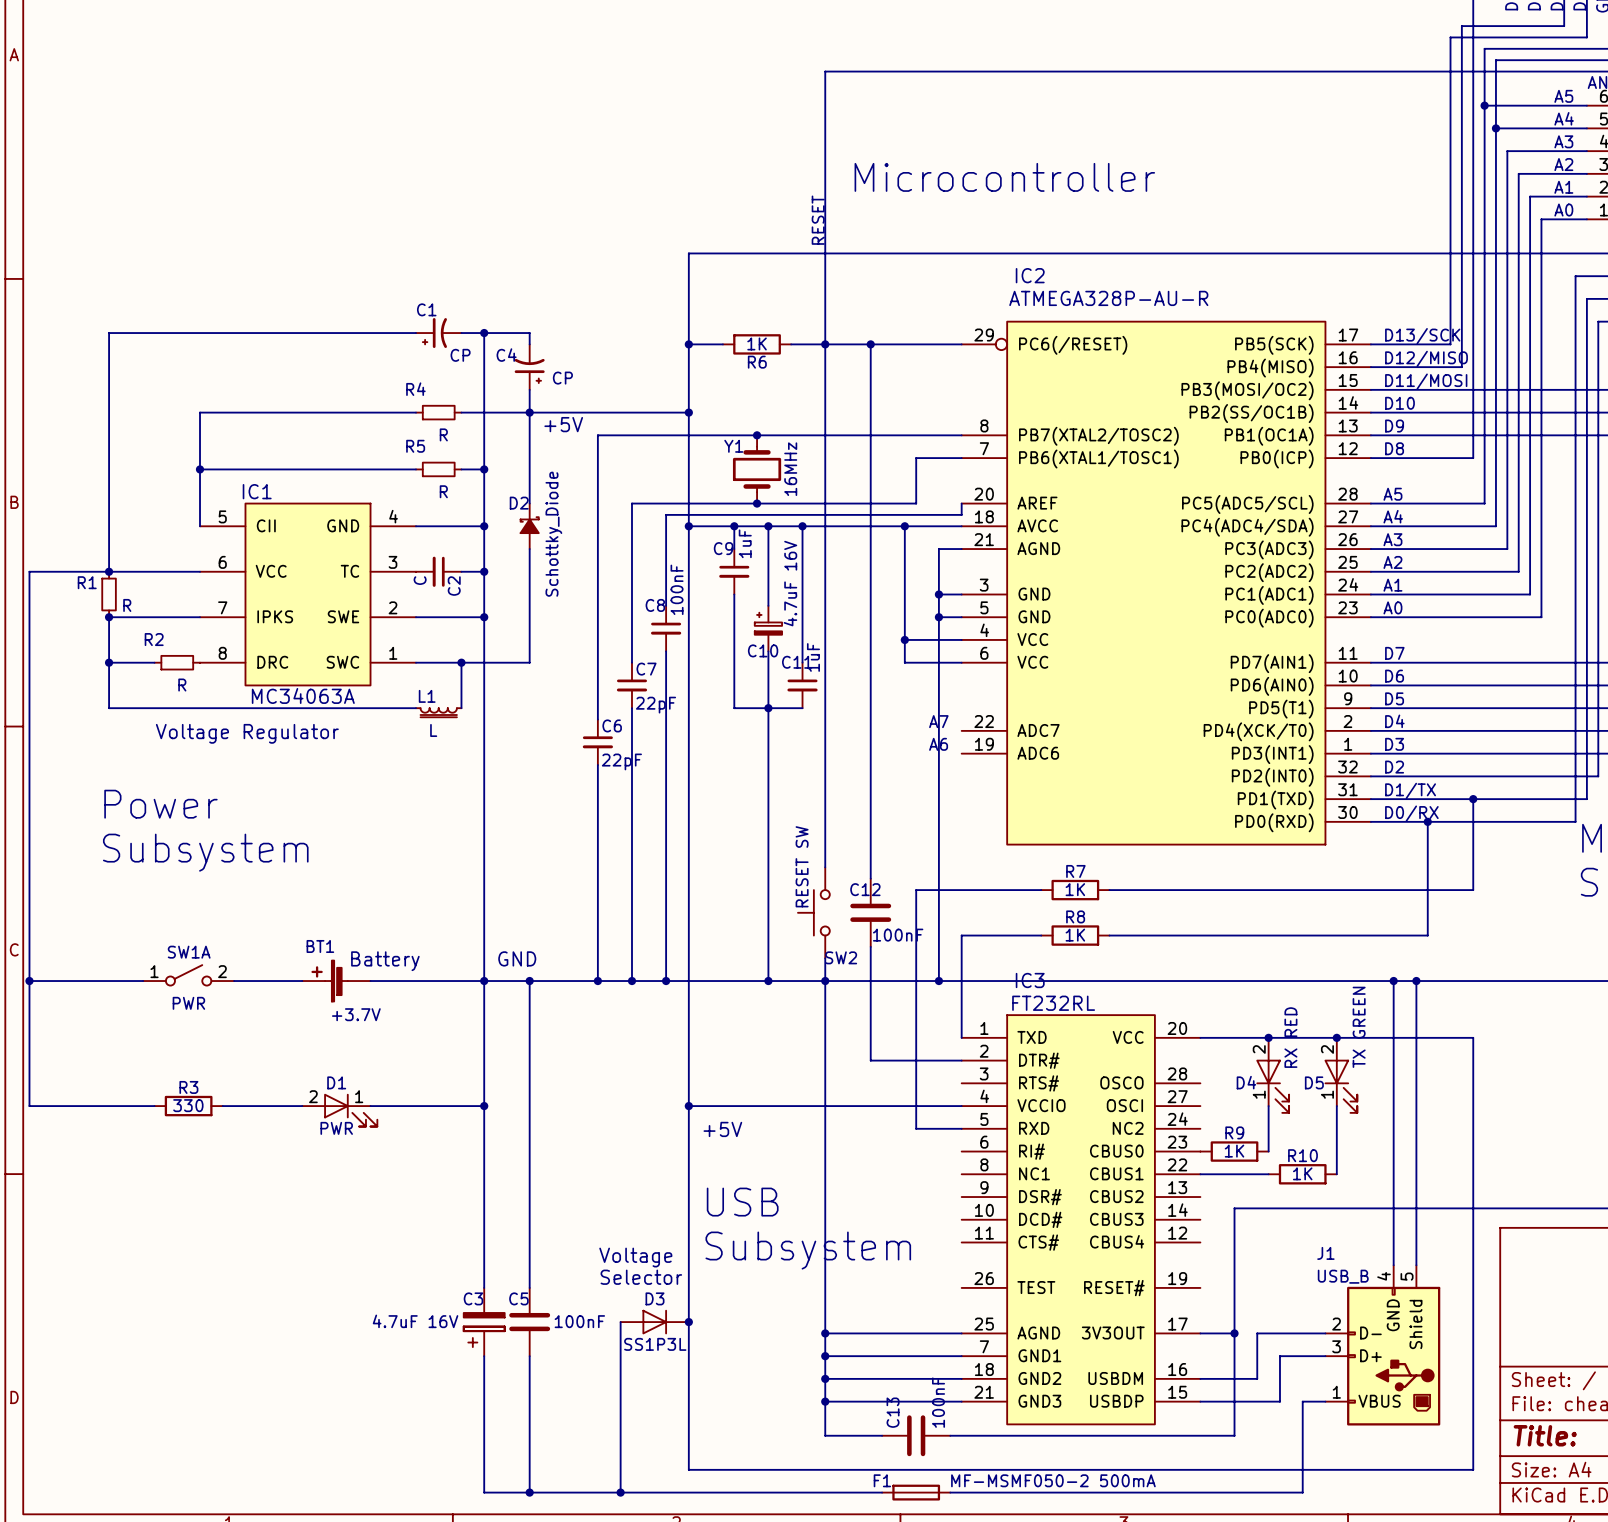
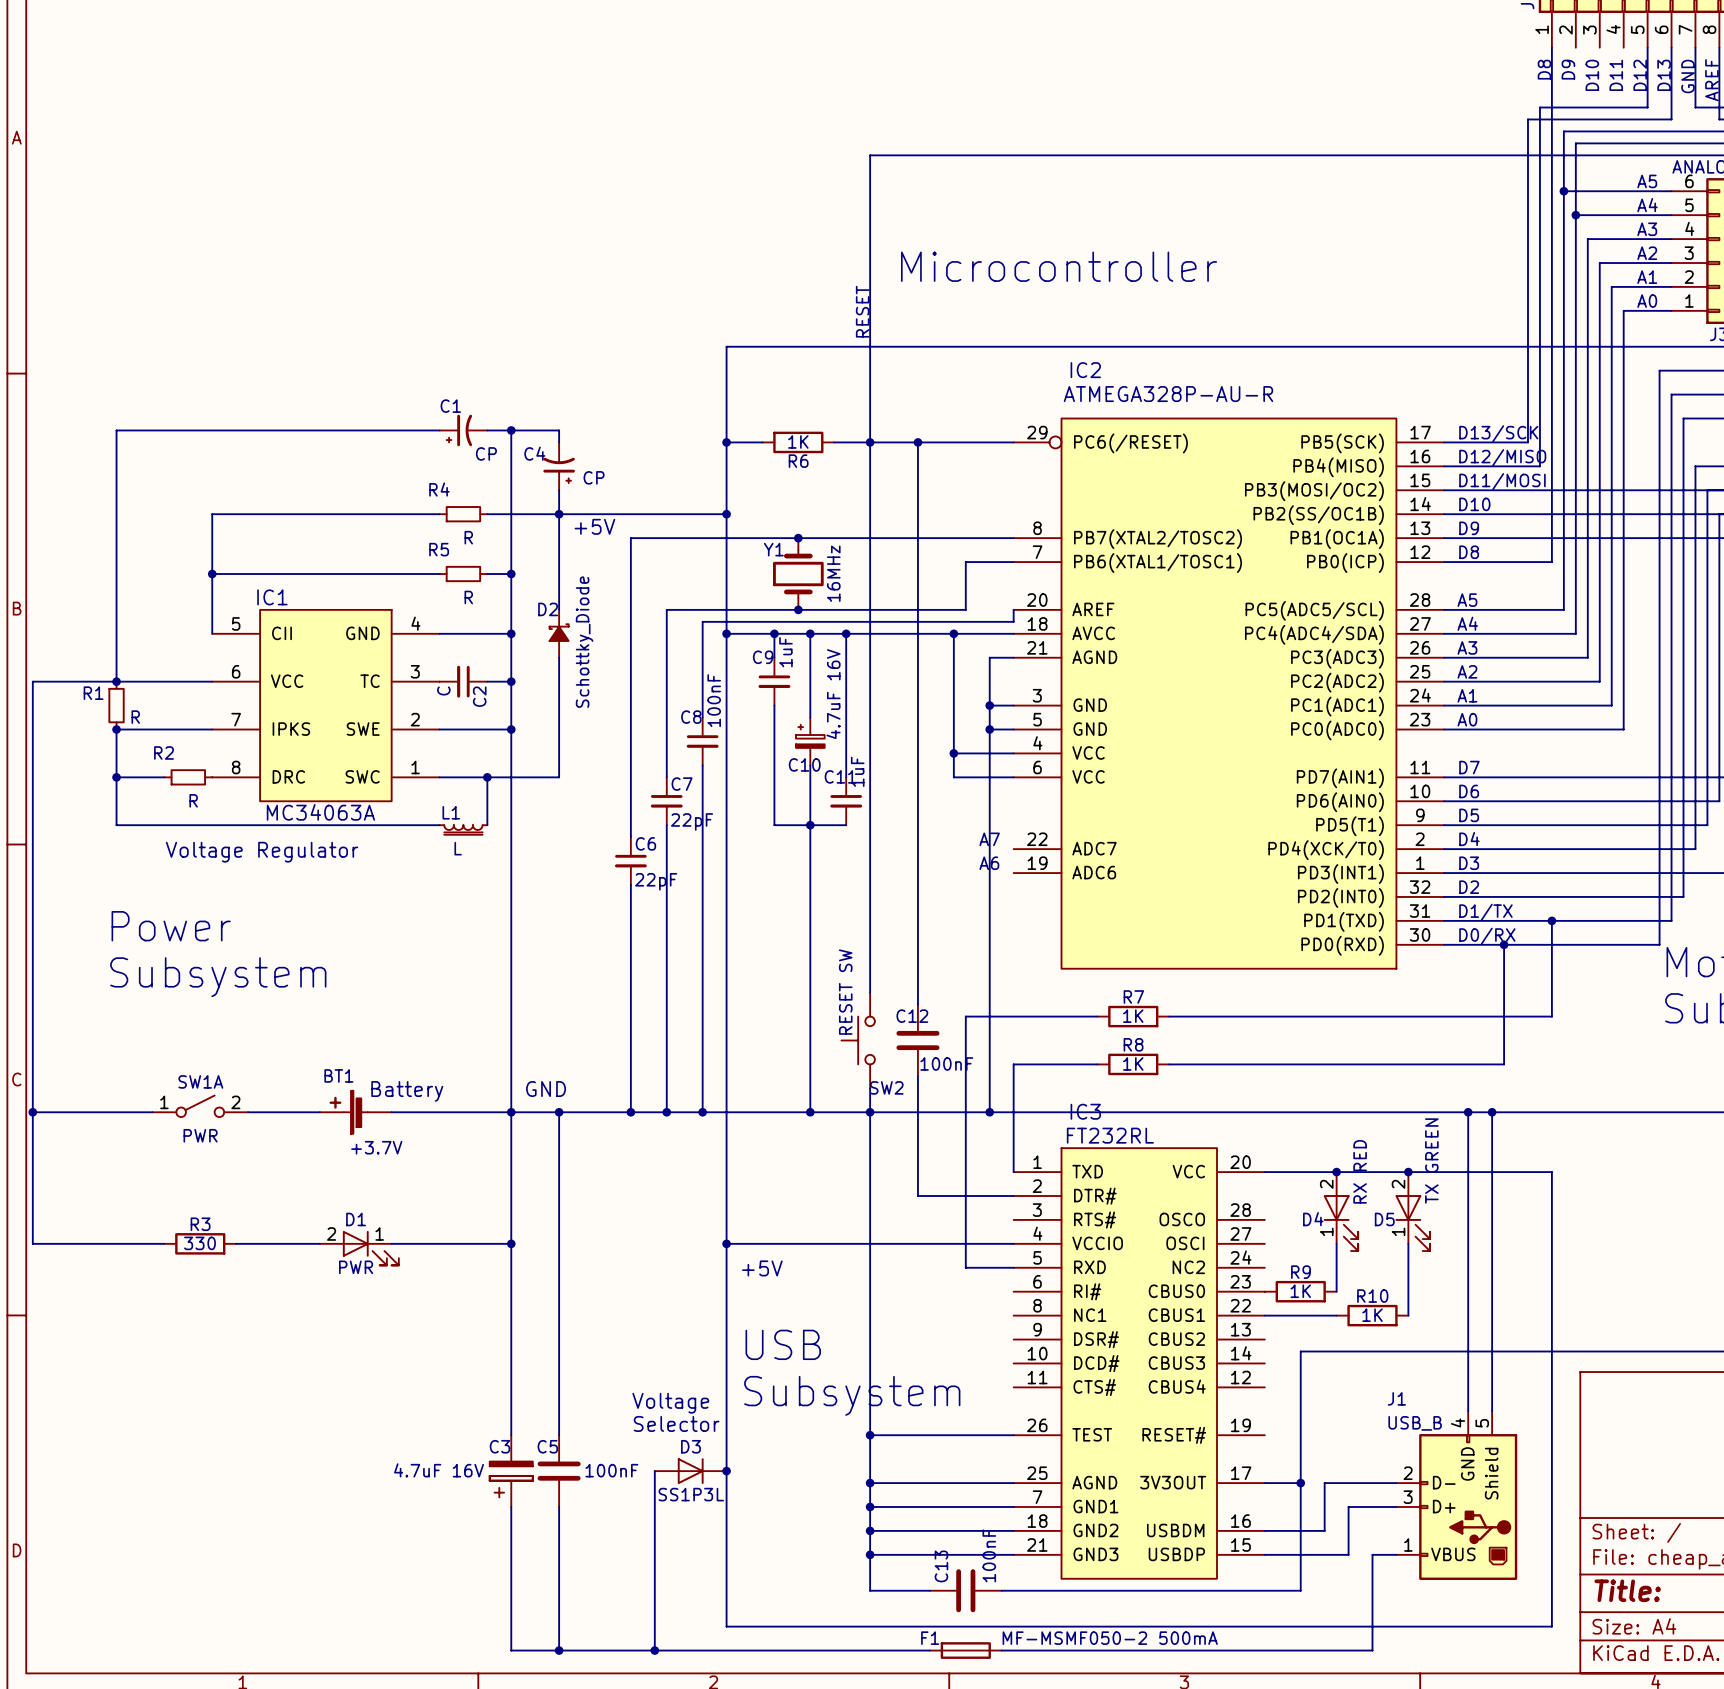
wire: none -> (870, 1435) (1013, 1435)
junction: none -> (870, 1435)

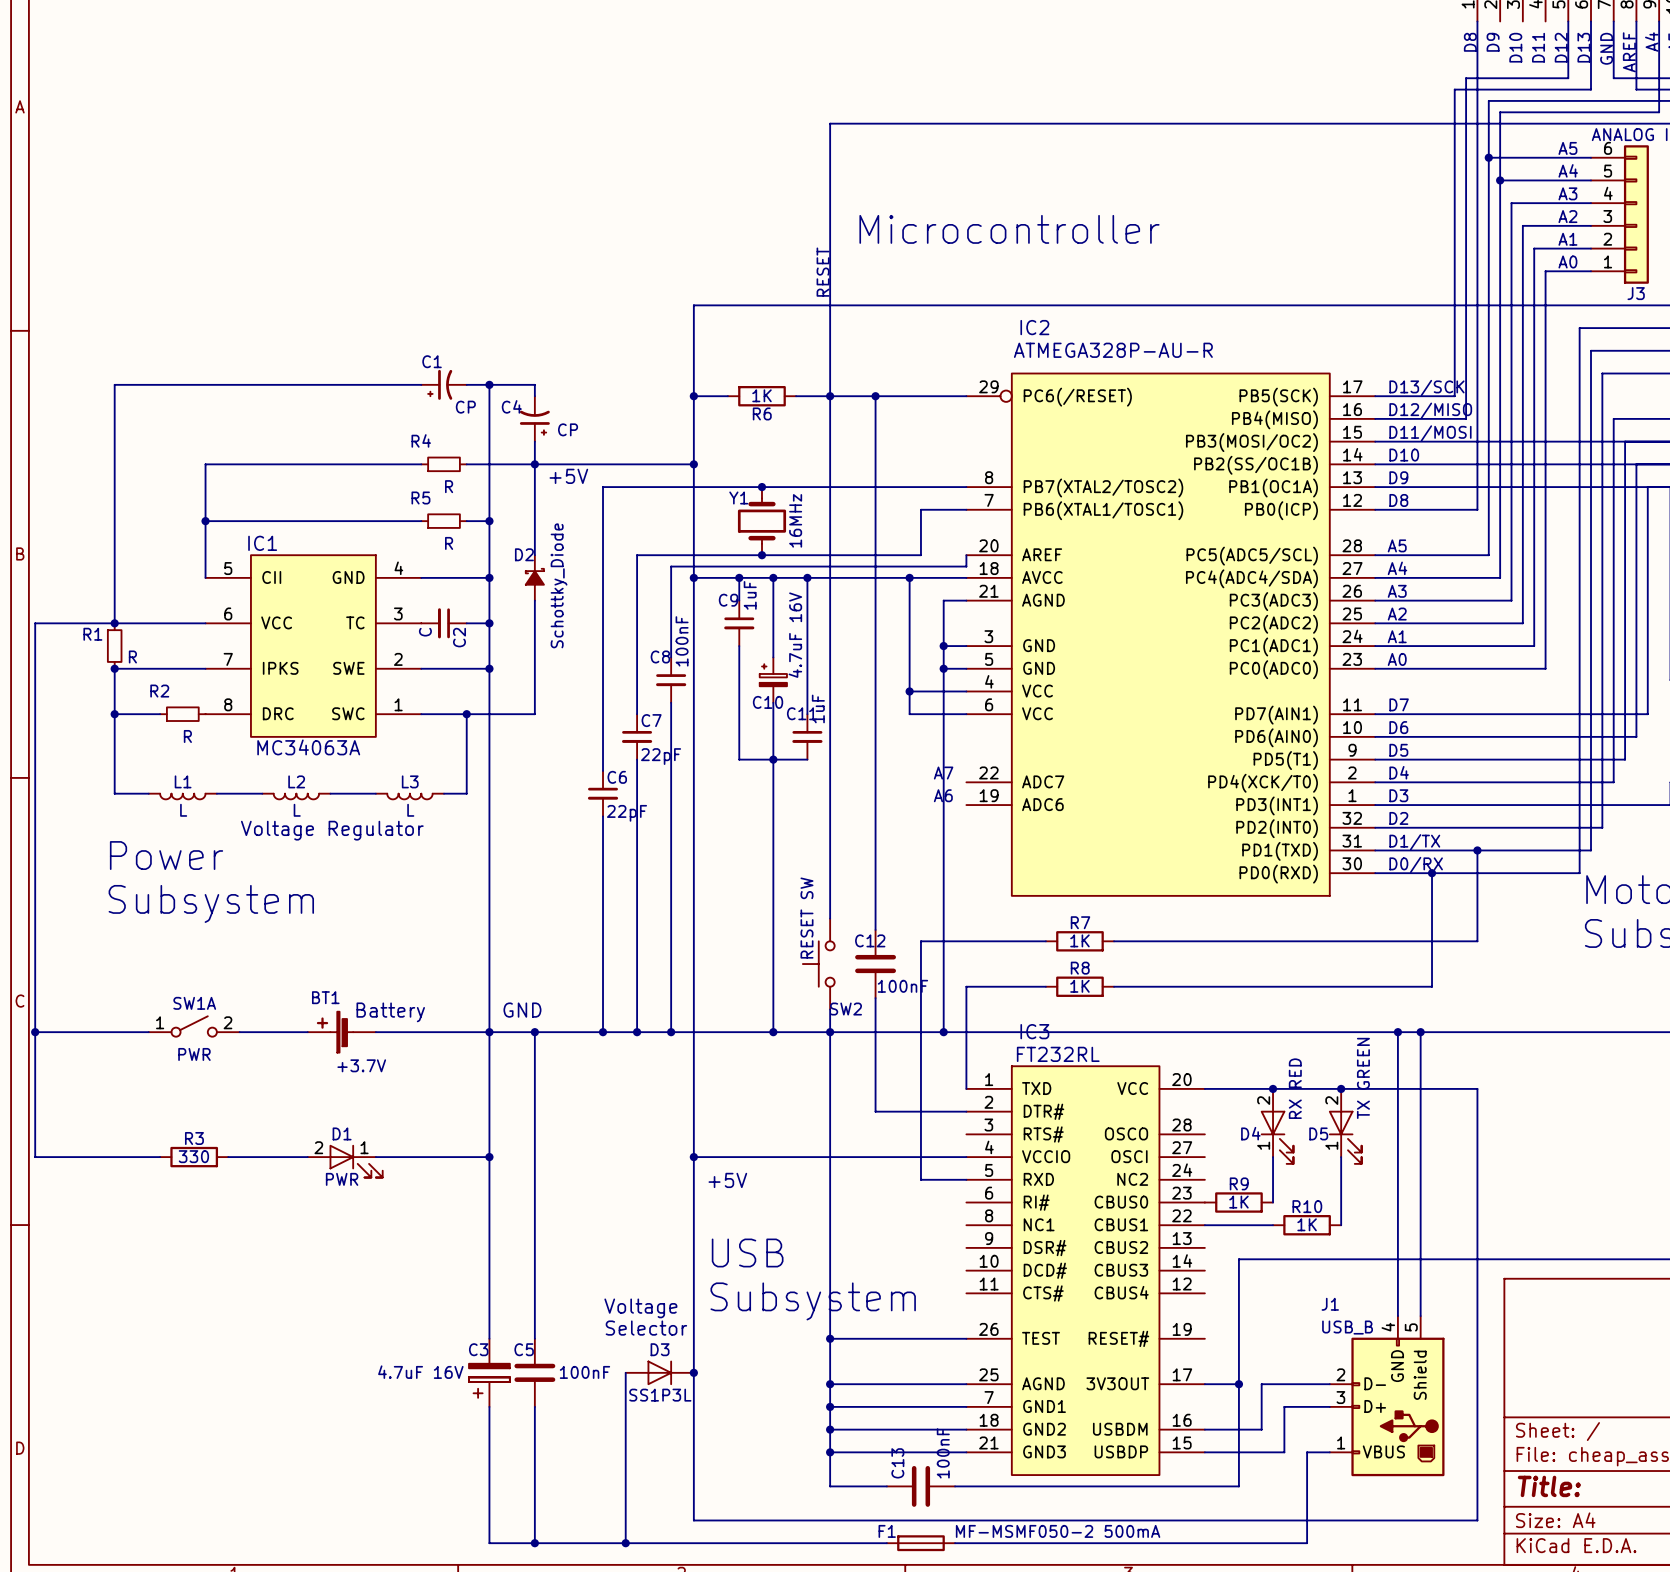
wire: (116, 825) (439, 825) -> (114, 759) (114, 793) (148, 793)
L1 symbol: [439, 825, 488, 835] -> [148, 793, 217, 800]
wire: none -> (466, 759) (466, 793) (444, 793)
text position: Voltage Regulator (262, 852) -> Voltage Regulator (332, 830)
wire: none -> (216, 793) (262, 793)
wire: none -> (330, 793) (375, 793)
L2: none -> L (296, 796)
L3: none -> L (409, 796)

